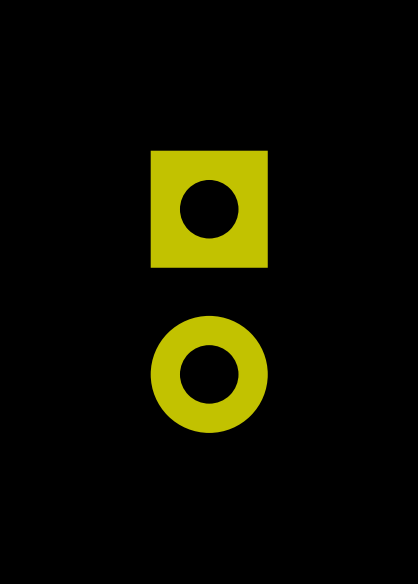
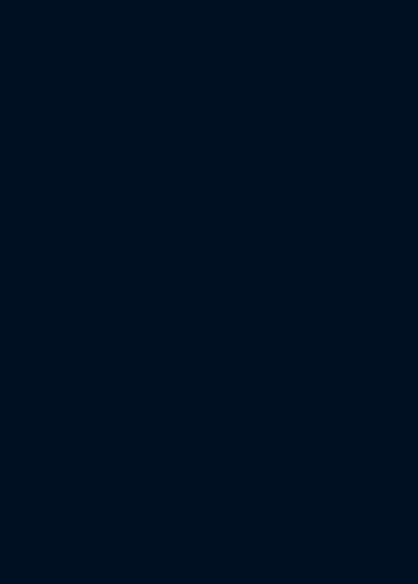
part: (209, 291) -> none

